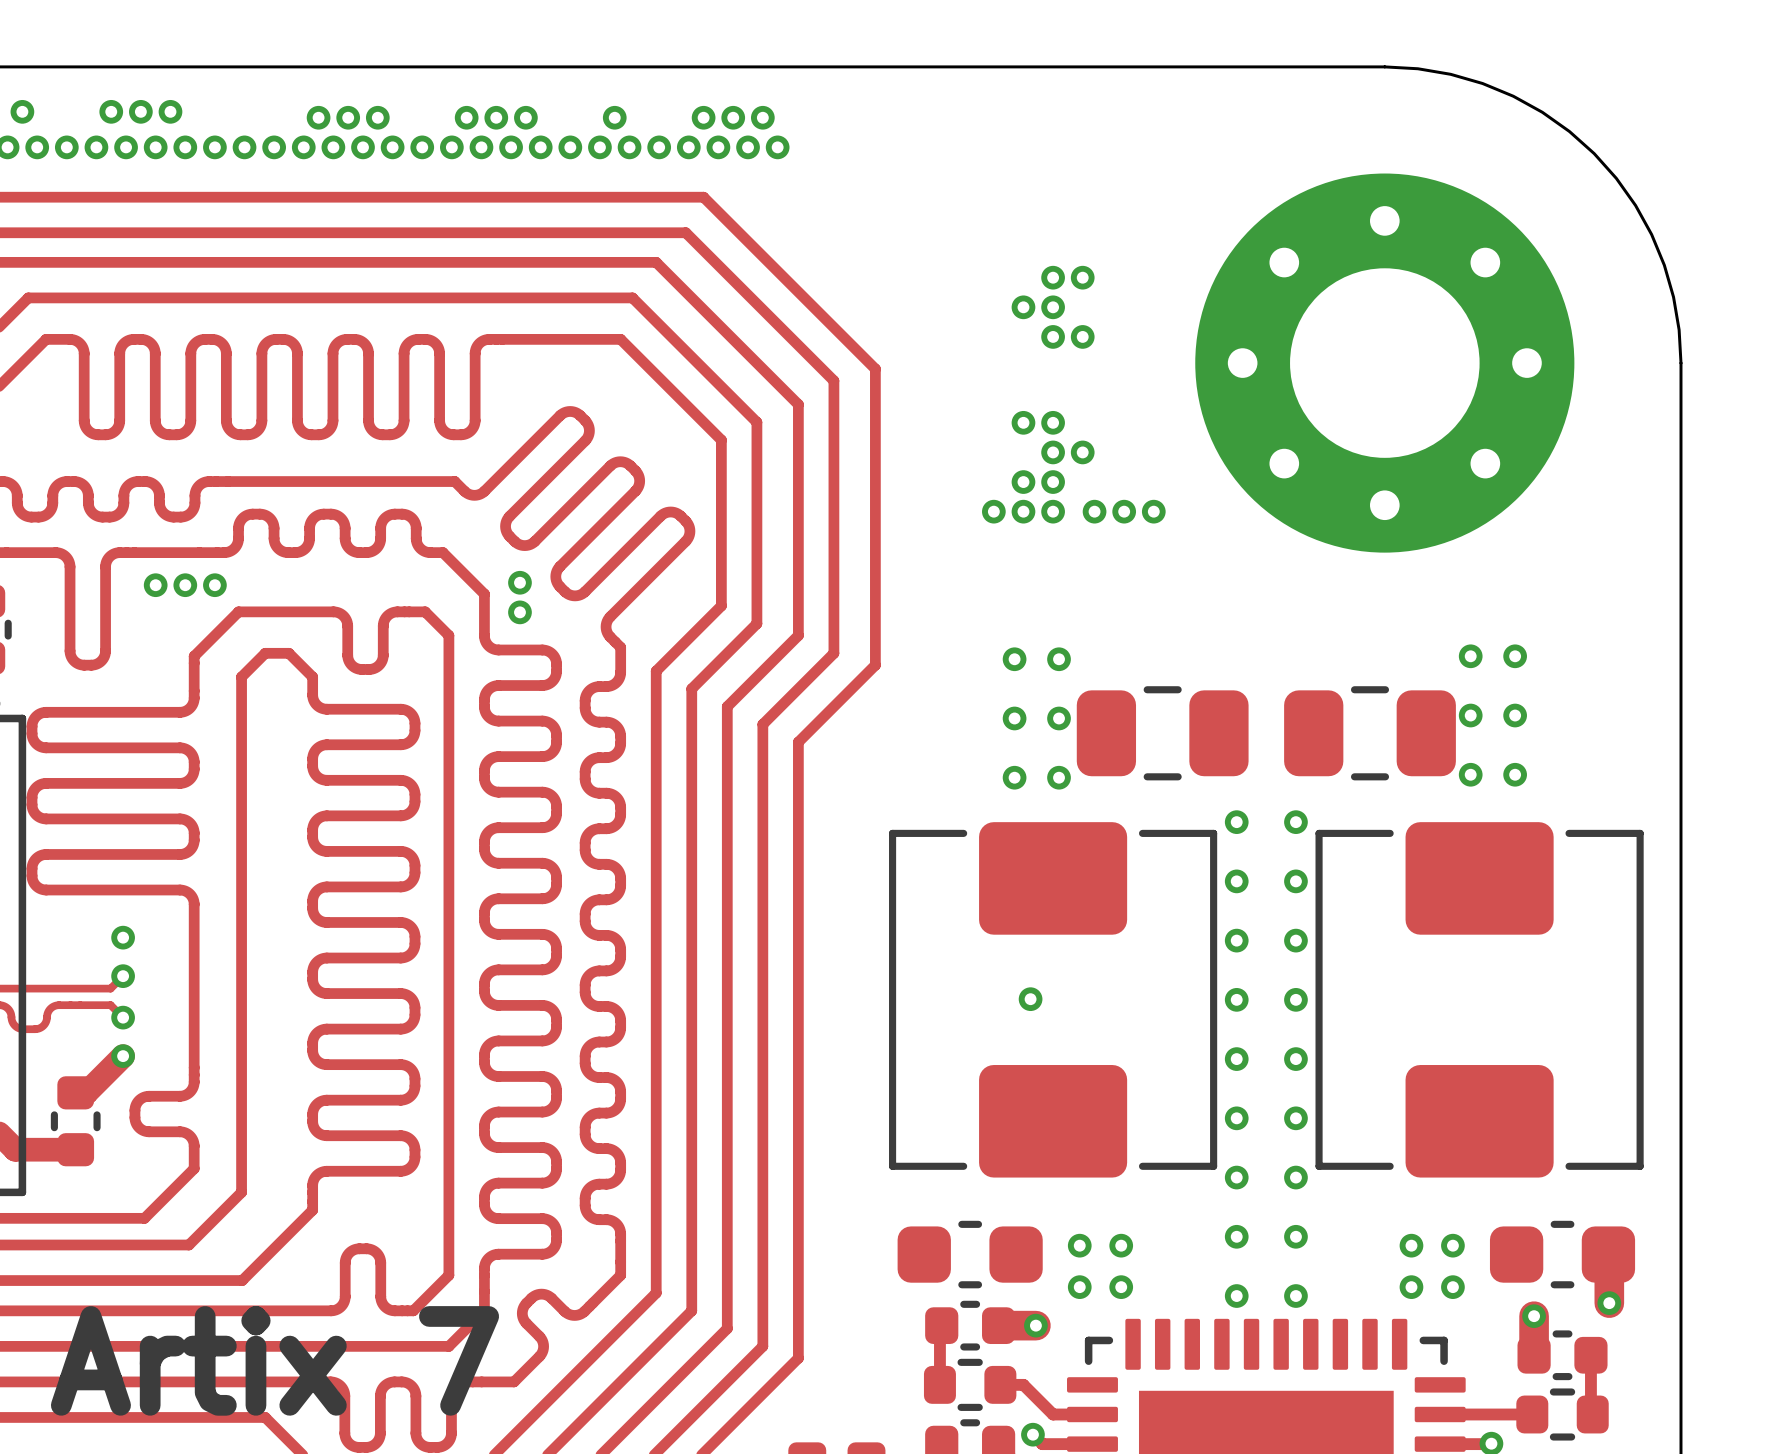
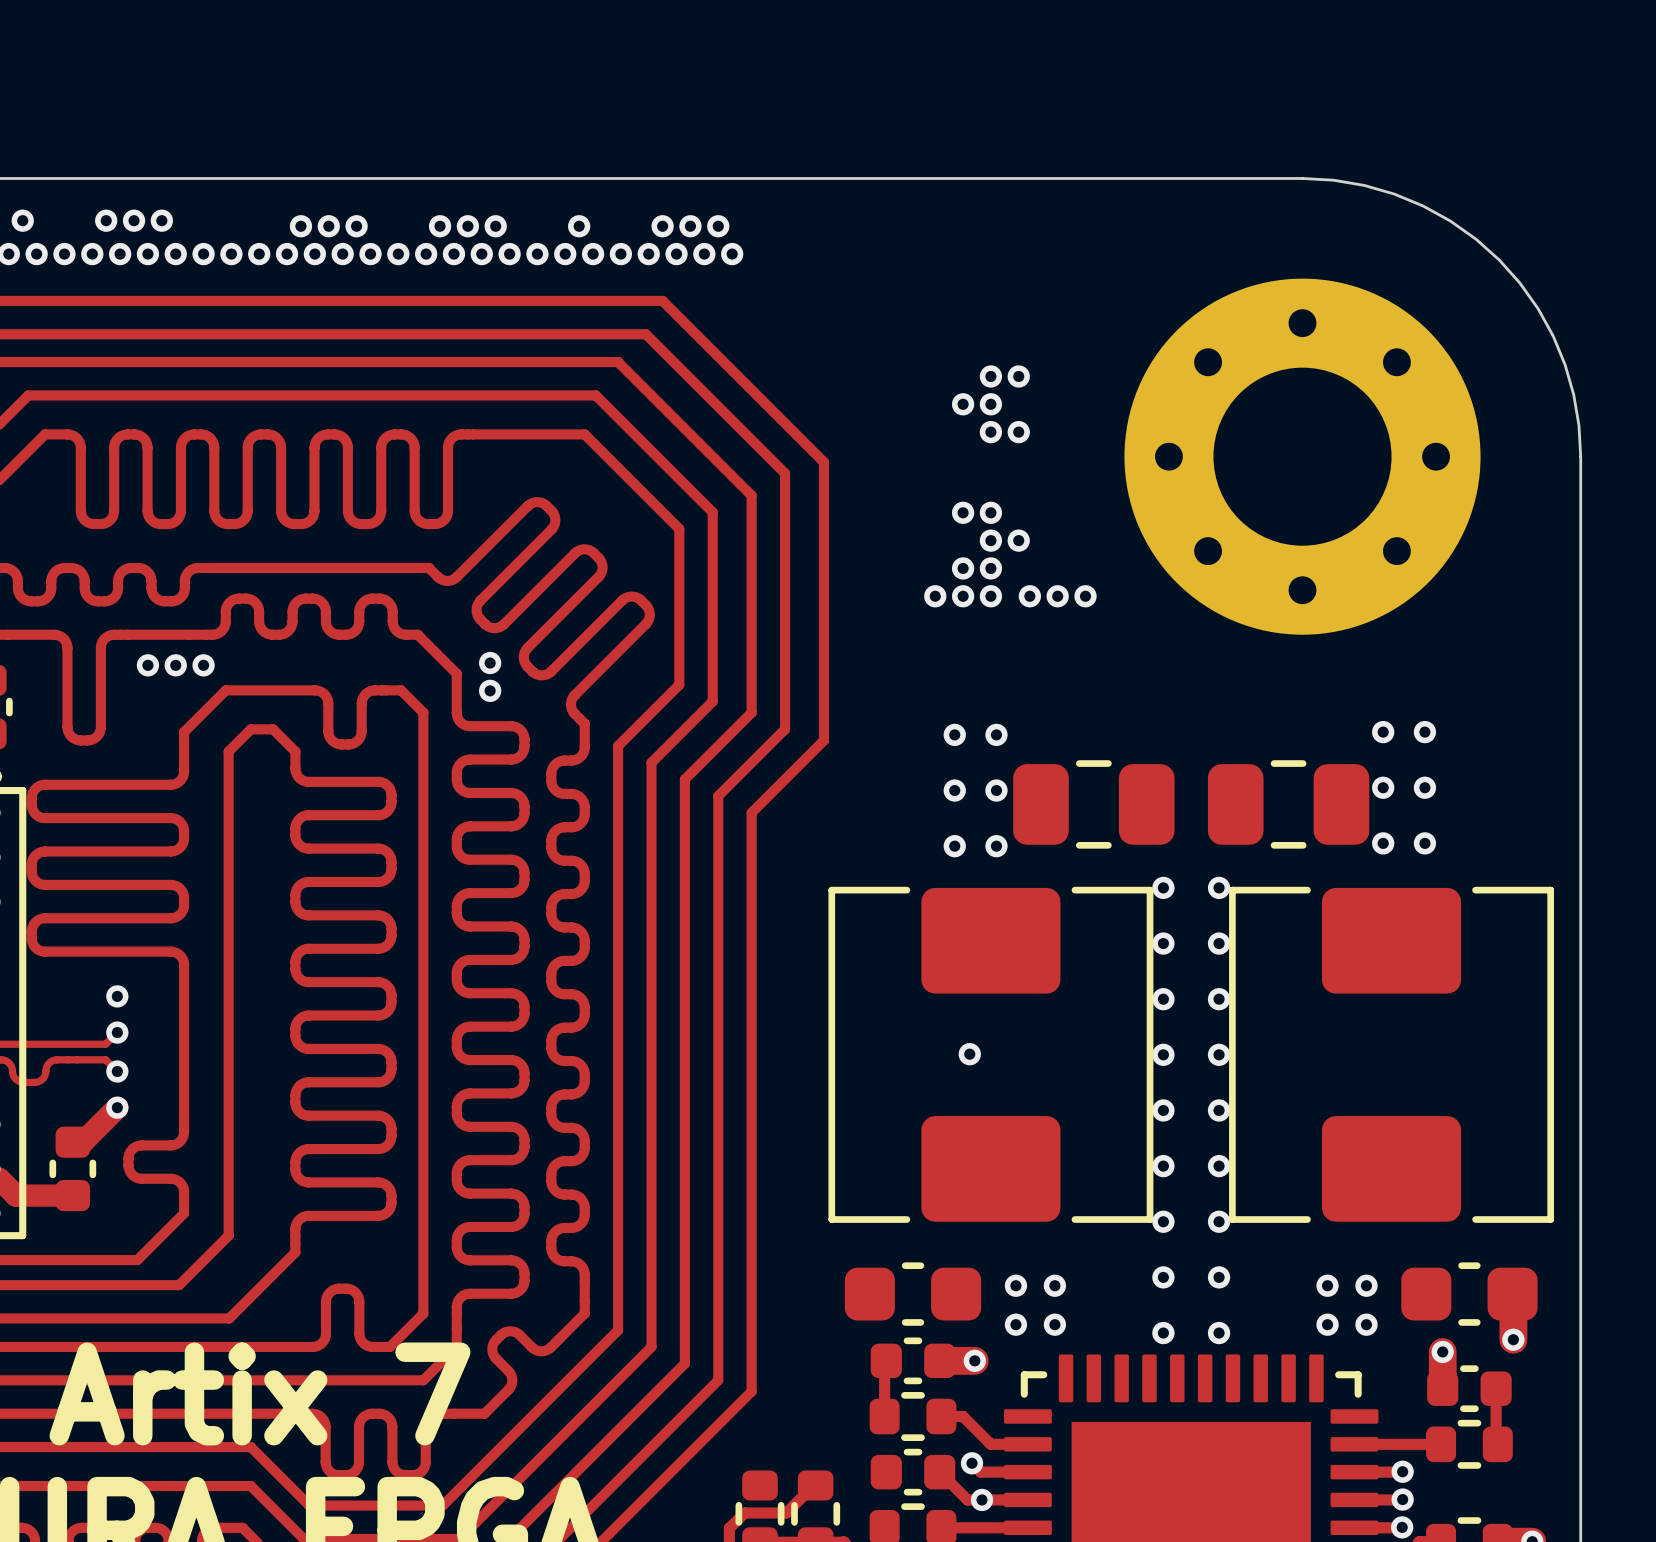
part footprint: [889, 822, 1218, 1178] -> [828, 886, 1154, 1223]
part footprint: [1315, 822, 1644, 1178] -> [1229, 886, 1555, 1223]

